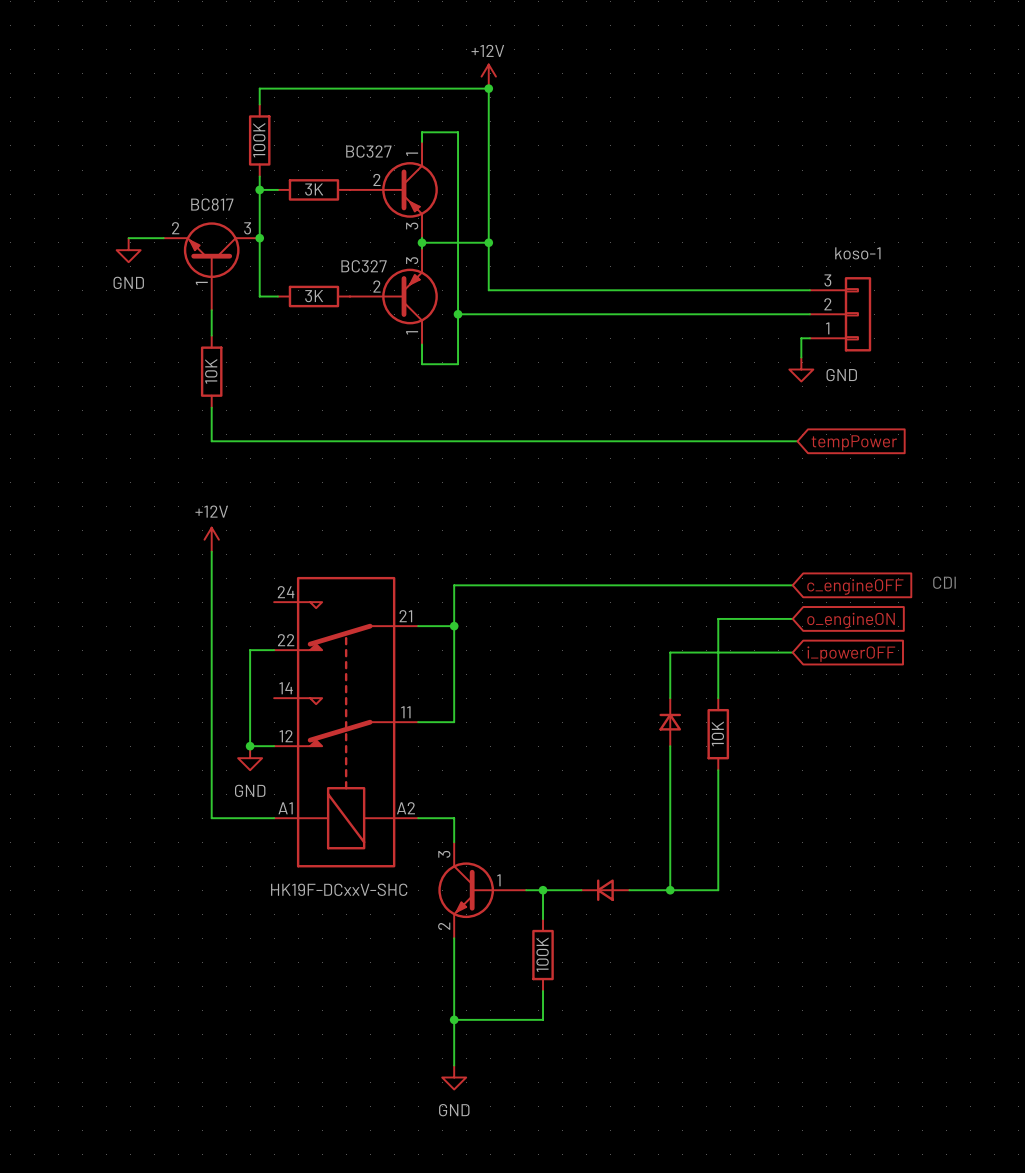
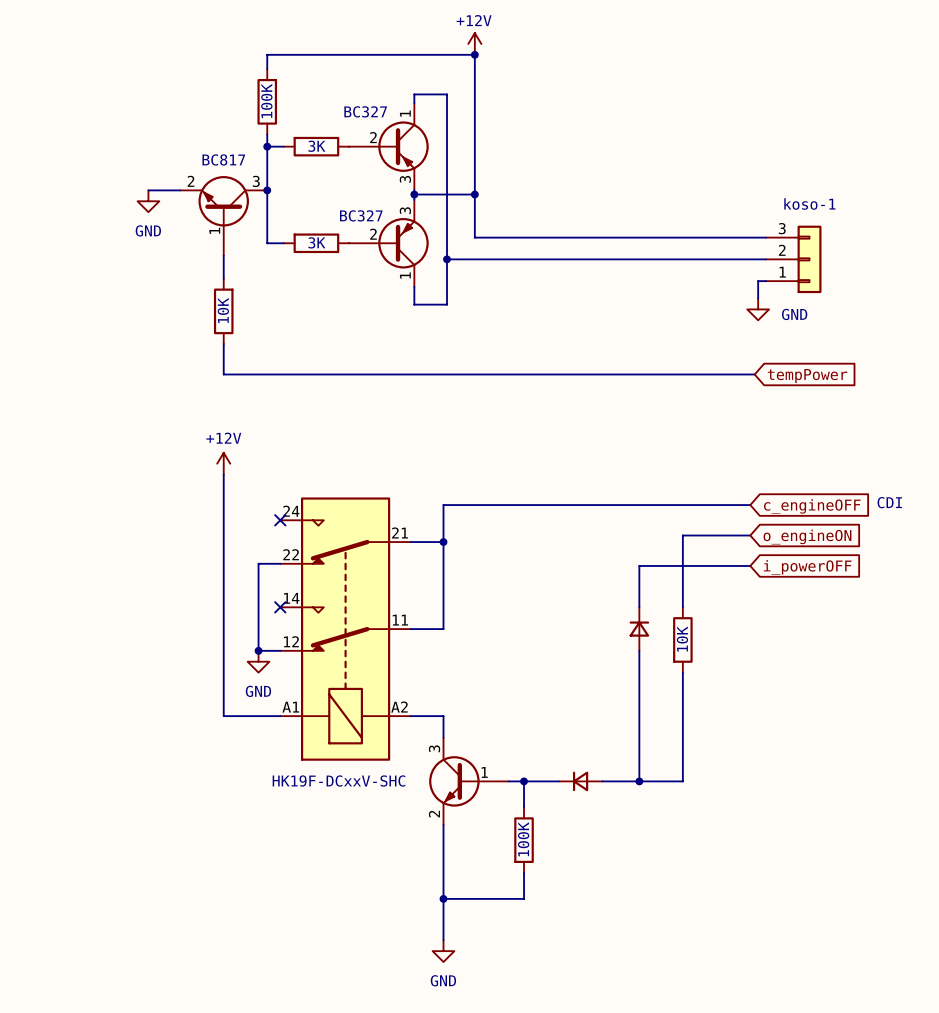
no-connect mark: none -> (280, 520)
no-connect mark: none -> (280, 607)

